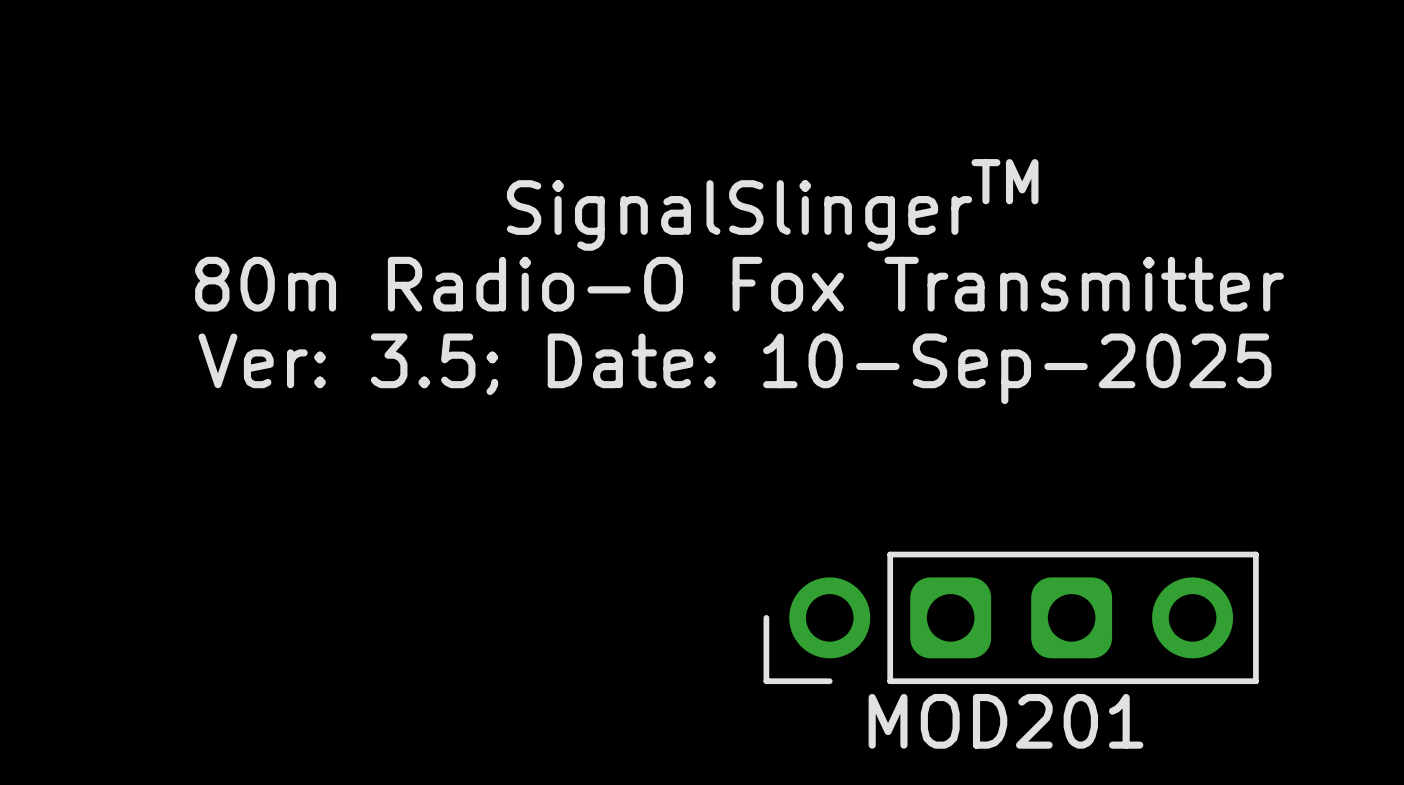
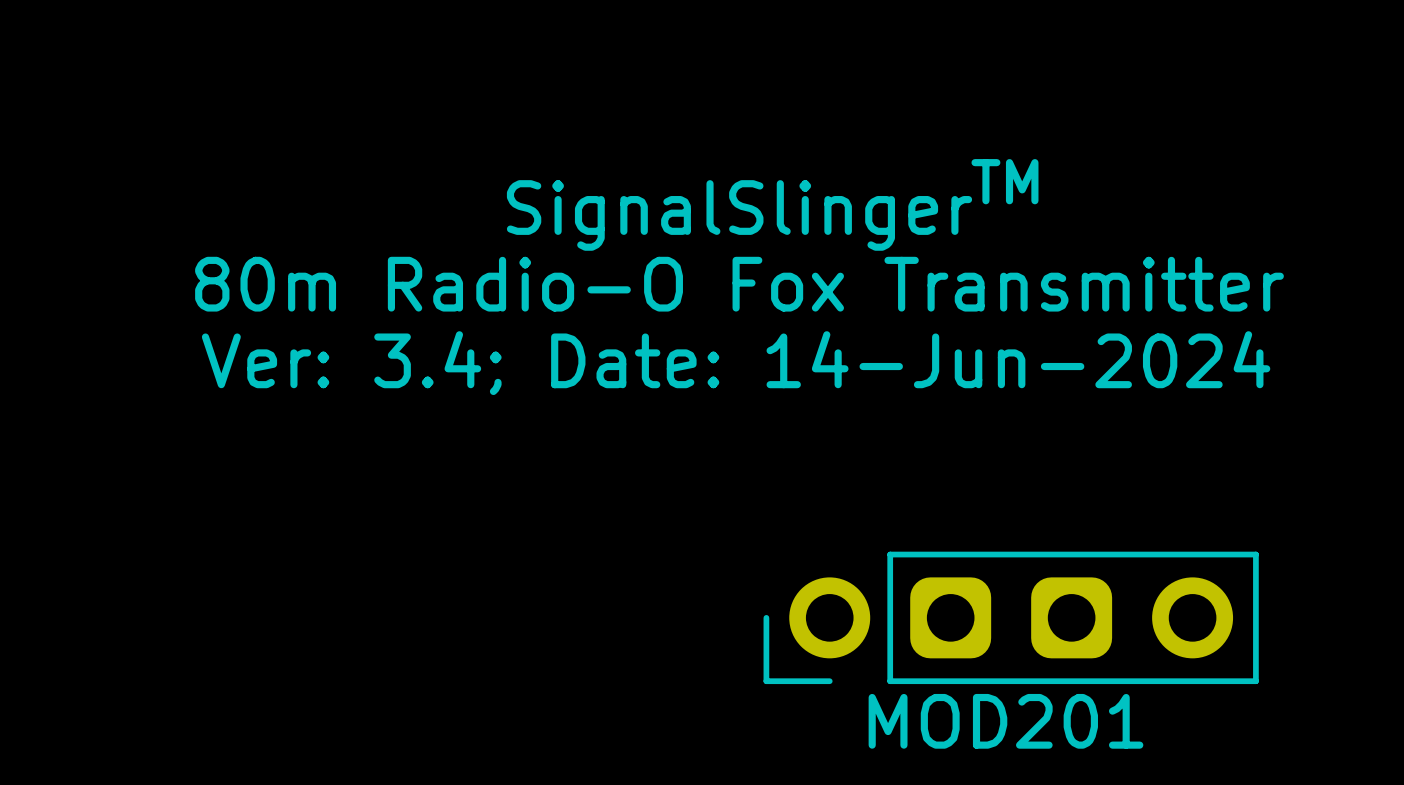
text: Ver: 3.5; Date: 10-Sep-2025 (734, 368) -> Ver: 3.4; Date: 14-Jun-2024 (736, 363)

